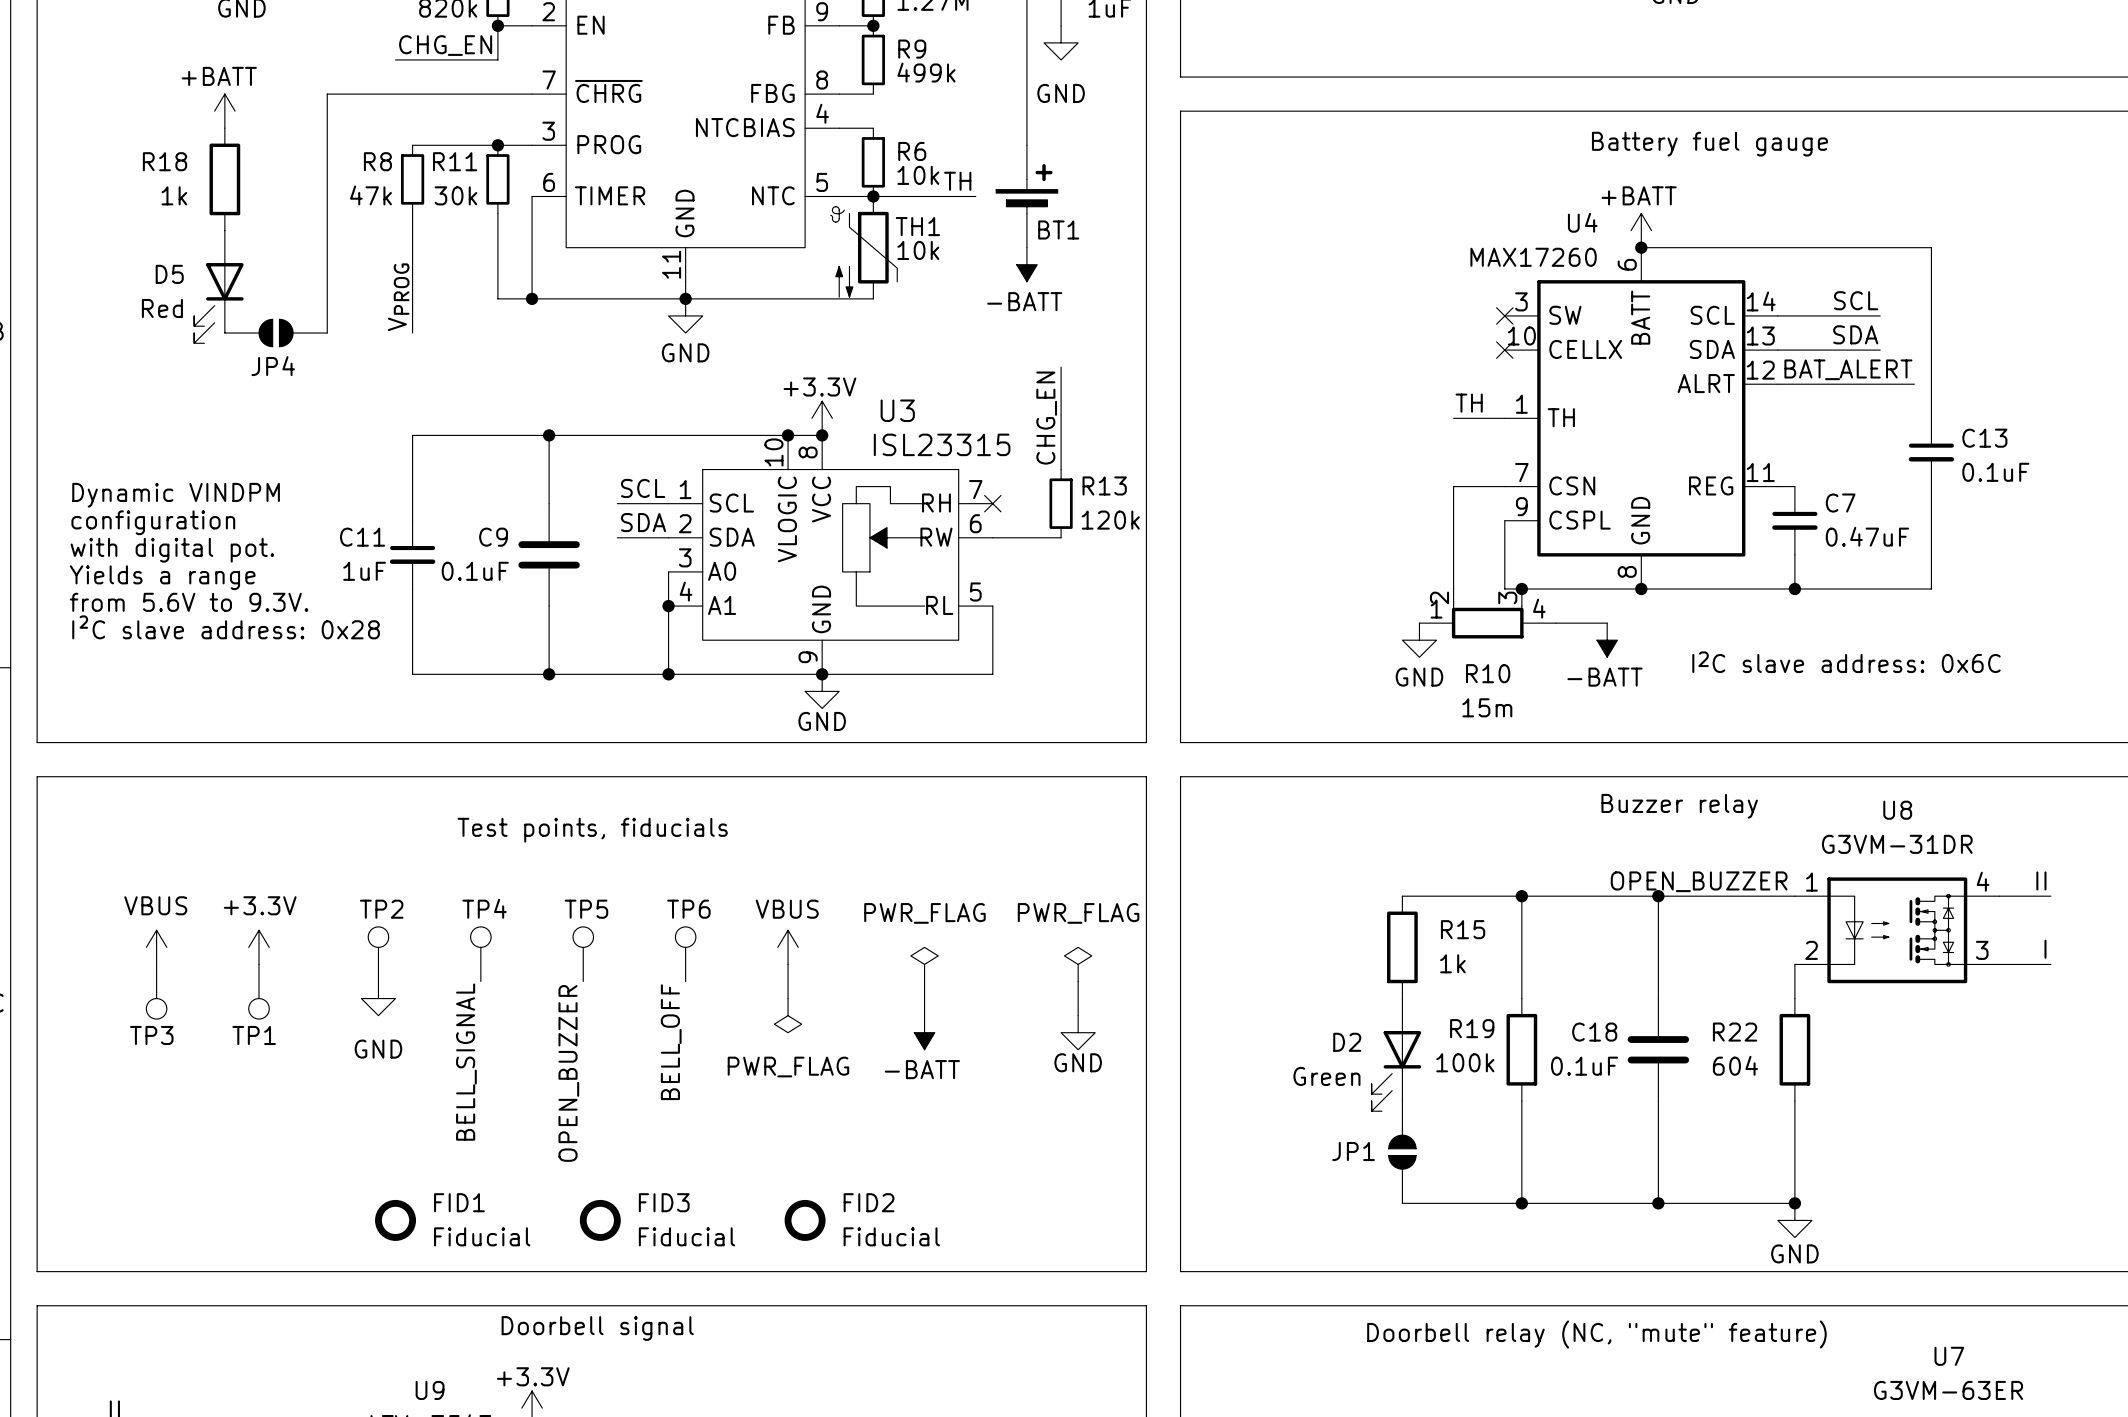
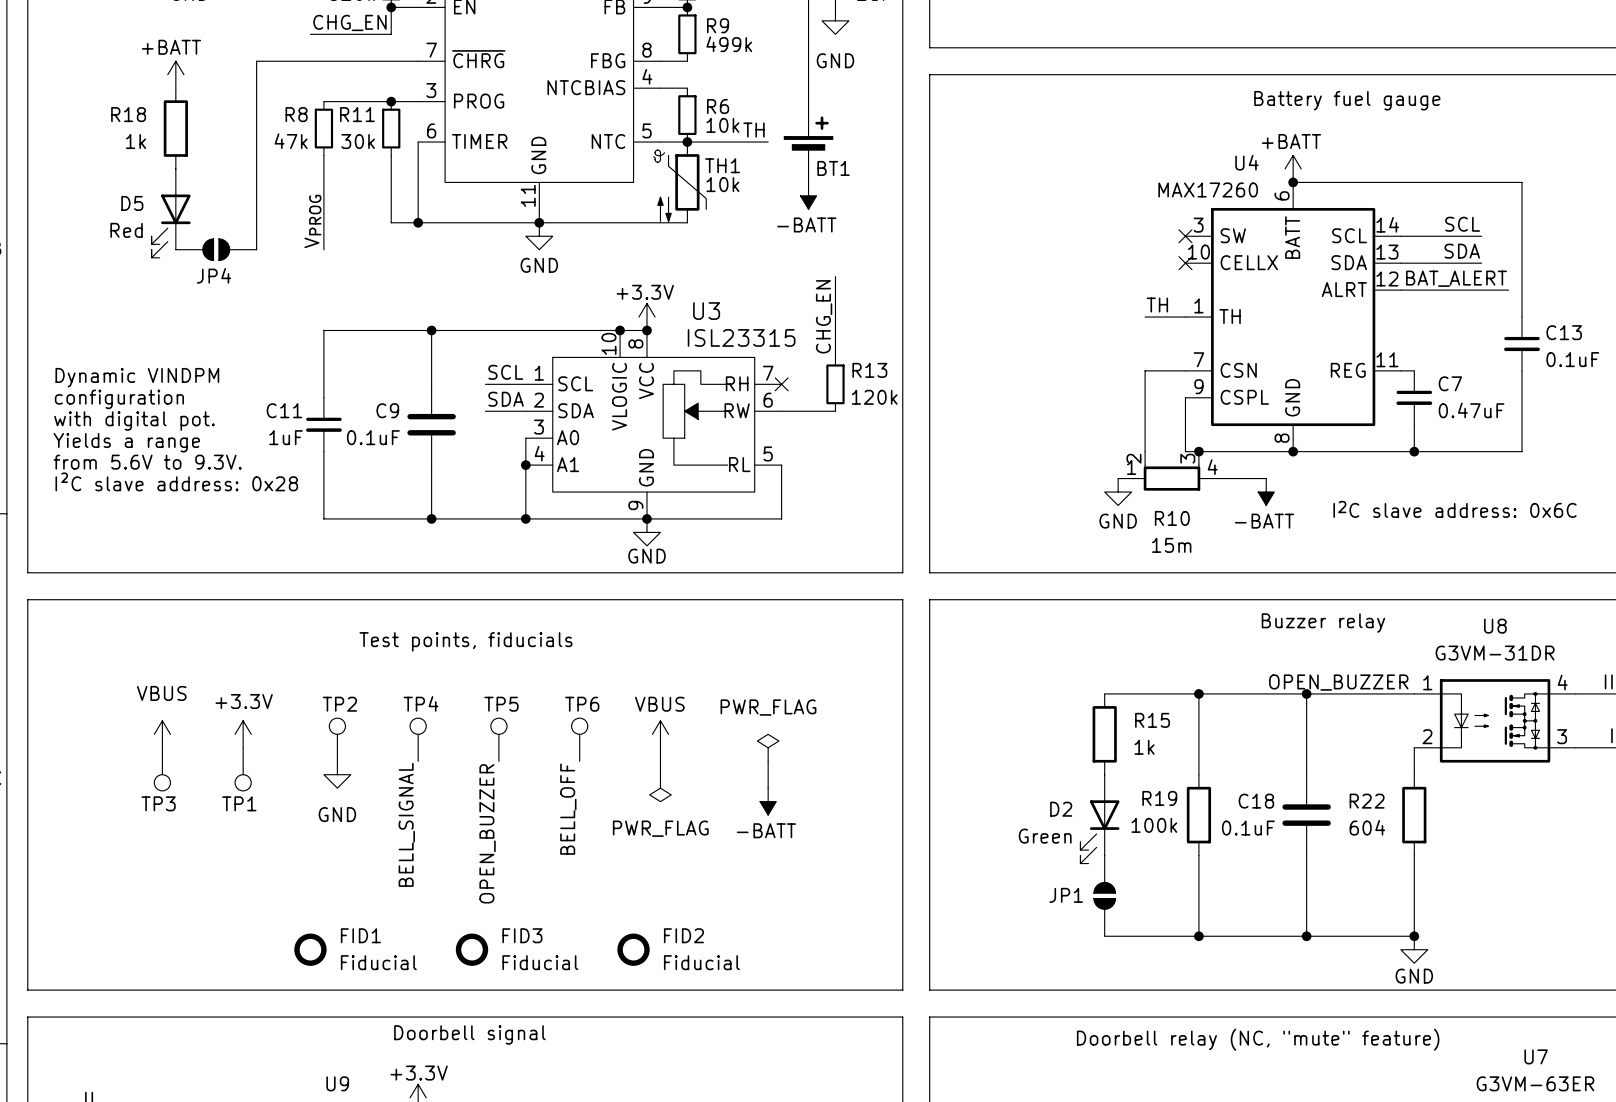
power symbol text position: VBUS (155, 905) -> VBUS (161, 693)
power symbol position: VBUS (156, 947) -> VBUS (162, 734)
power symbol position: +3.3V (259, 947) -> +3.3V (243, 734)
power symbol position: VBUS (788, 947) -> VBUS (660, 734)
TP2 position: (378, 954) -> (337, 739)
TP4 position: (480, 954) -> (418, 739)
TP5 position: (583, 954) -> (498, 739)
TP6 position: (685, 954) -> (579, 739)
wire: (788, 964) (788, 998) -> (660, 747) (660, 774)
power symbol: PWR_FLAG (924, 964) -> none
power symbol: none -> PWR_FLAG (768, 747)
power symbol: PWR_FLAG (1078, 964) -> none
wire: (924, 981) (924, 1015) -> (768, 761) (768, 788)
wire: (1078, 981) (1078, 1015) -> none
TP3 position: (156, 991) -> (162, 769)
TP1 position: (259, 991) -> (243, 769)
power symbol position: GND (378, 998) -> GND (337, 774)
power symbol: PWR_FLAG (788, 1015) -> none
power symbol: none -> PWR_FLAG (660, 788)
power symbol position: -BATT (924, 1032) -> -BATT (768, 801)
power symbol: GND (1078, 1032) -> none
label position: BELL_OFF (671, 1042) -> BELL_OFF (568, 809)
label position: BELL_SIGNAL (466, 1062) -> BELL_SIGNAL (406, 824)
label position: OPEN_BUZZER (568, 1073) -> OPEN_BUZZER (487, 833)

